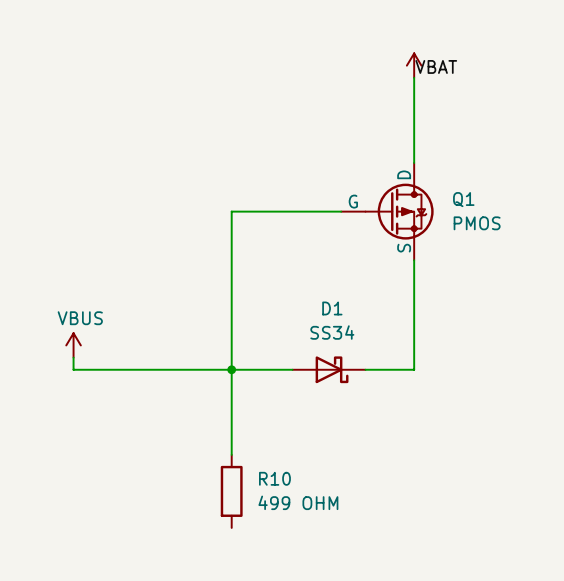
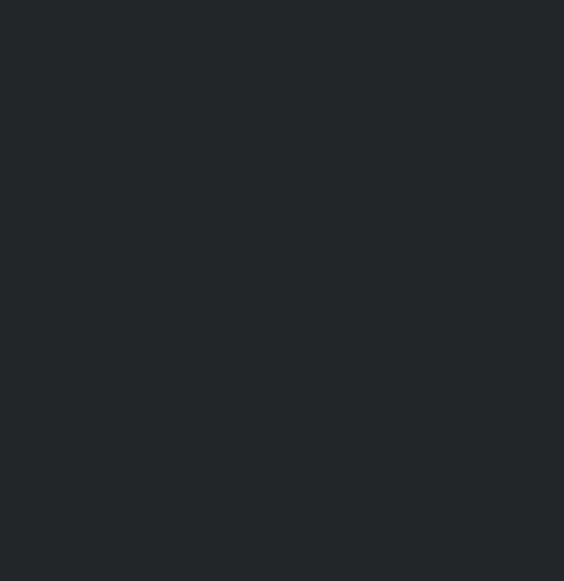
power symbol: (414, 65) -> none
label: VBAT (436, 66) -> none
wire: (414, 77) (414, 162) -> none
wire: (341, 211) (231, 211) (231, 454) -> none
Q1: PMOS (387, 211) -> none
wire: (414, 260) (414, 369) (365, 369) -> none
power symbol: VBUS (73, 345) -> none
wire: (73, 357) (73, 369) (292, 369) -> none
junction: (231, 369) -> none
D1: SS34 (329, 369) -> none
R10: 499 OHM (231, 491) -> none

